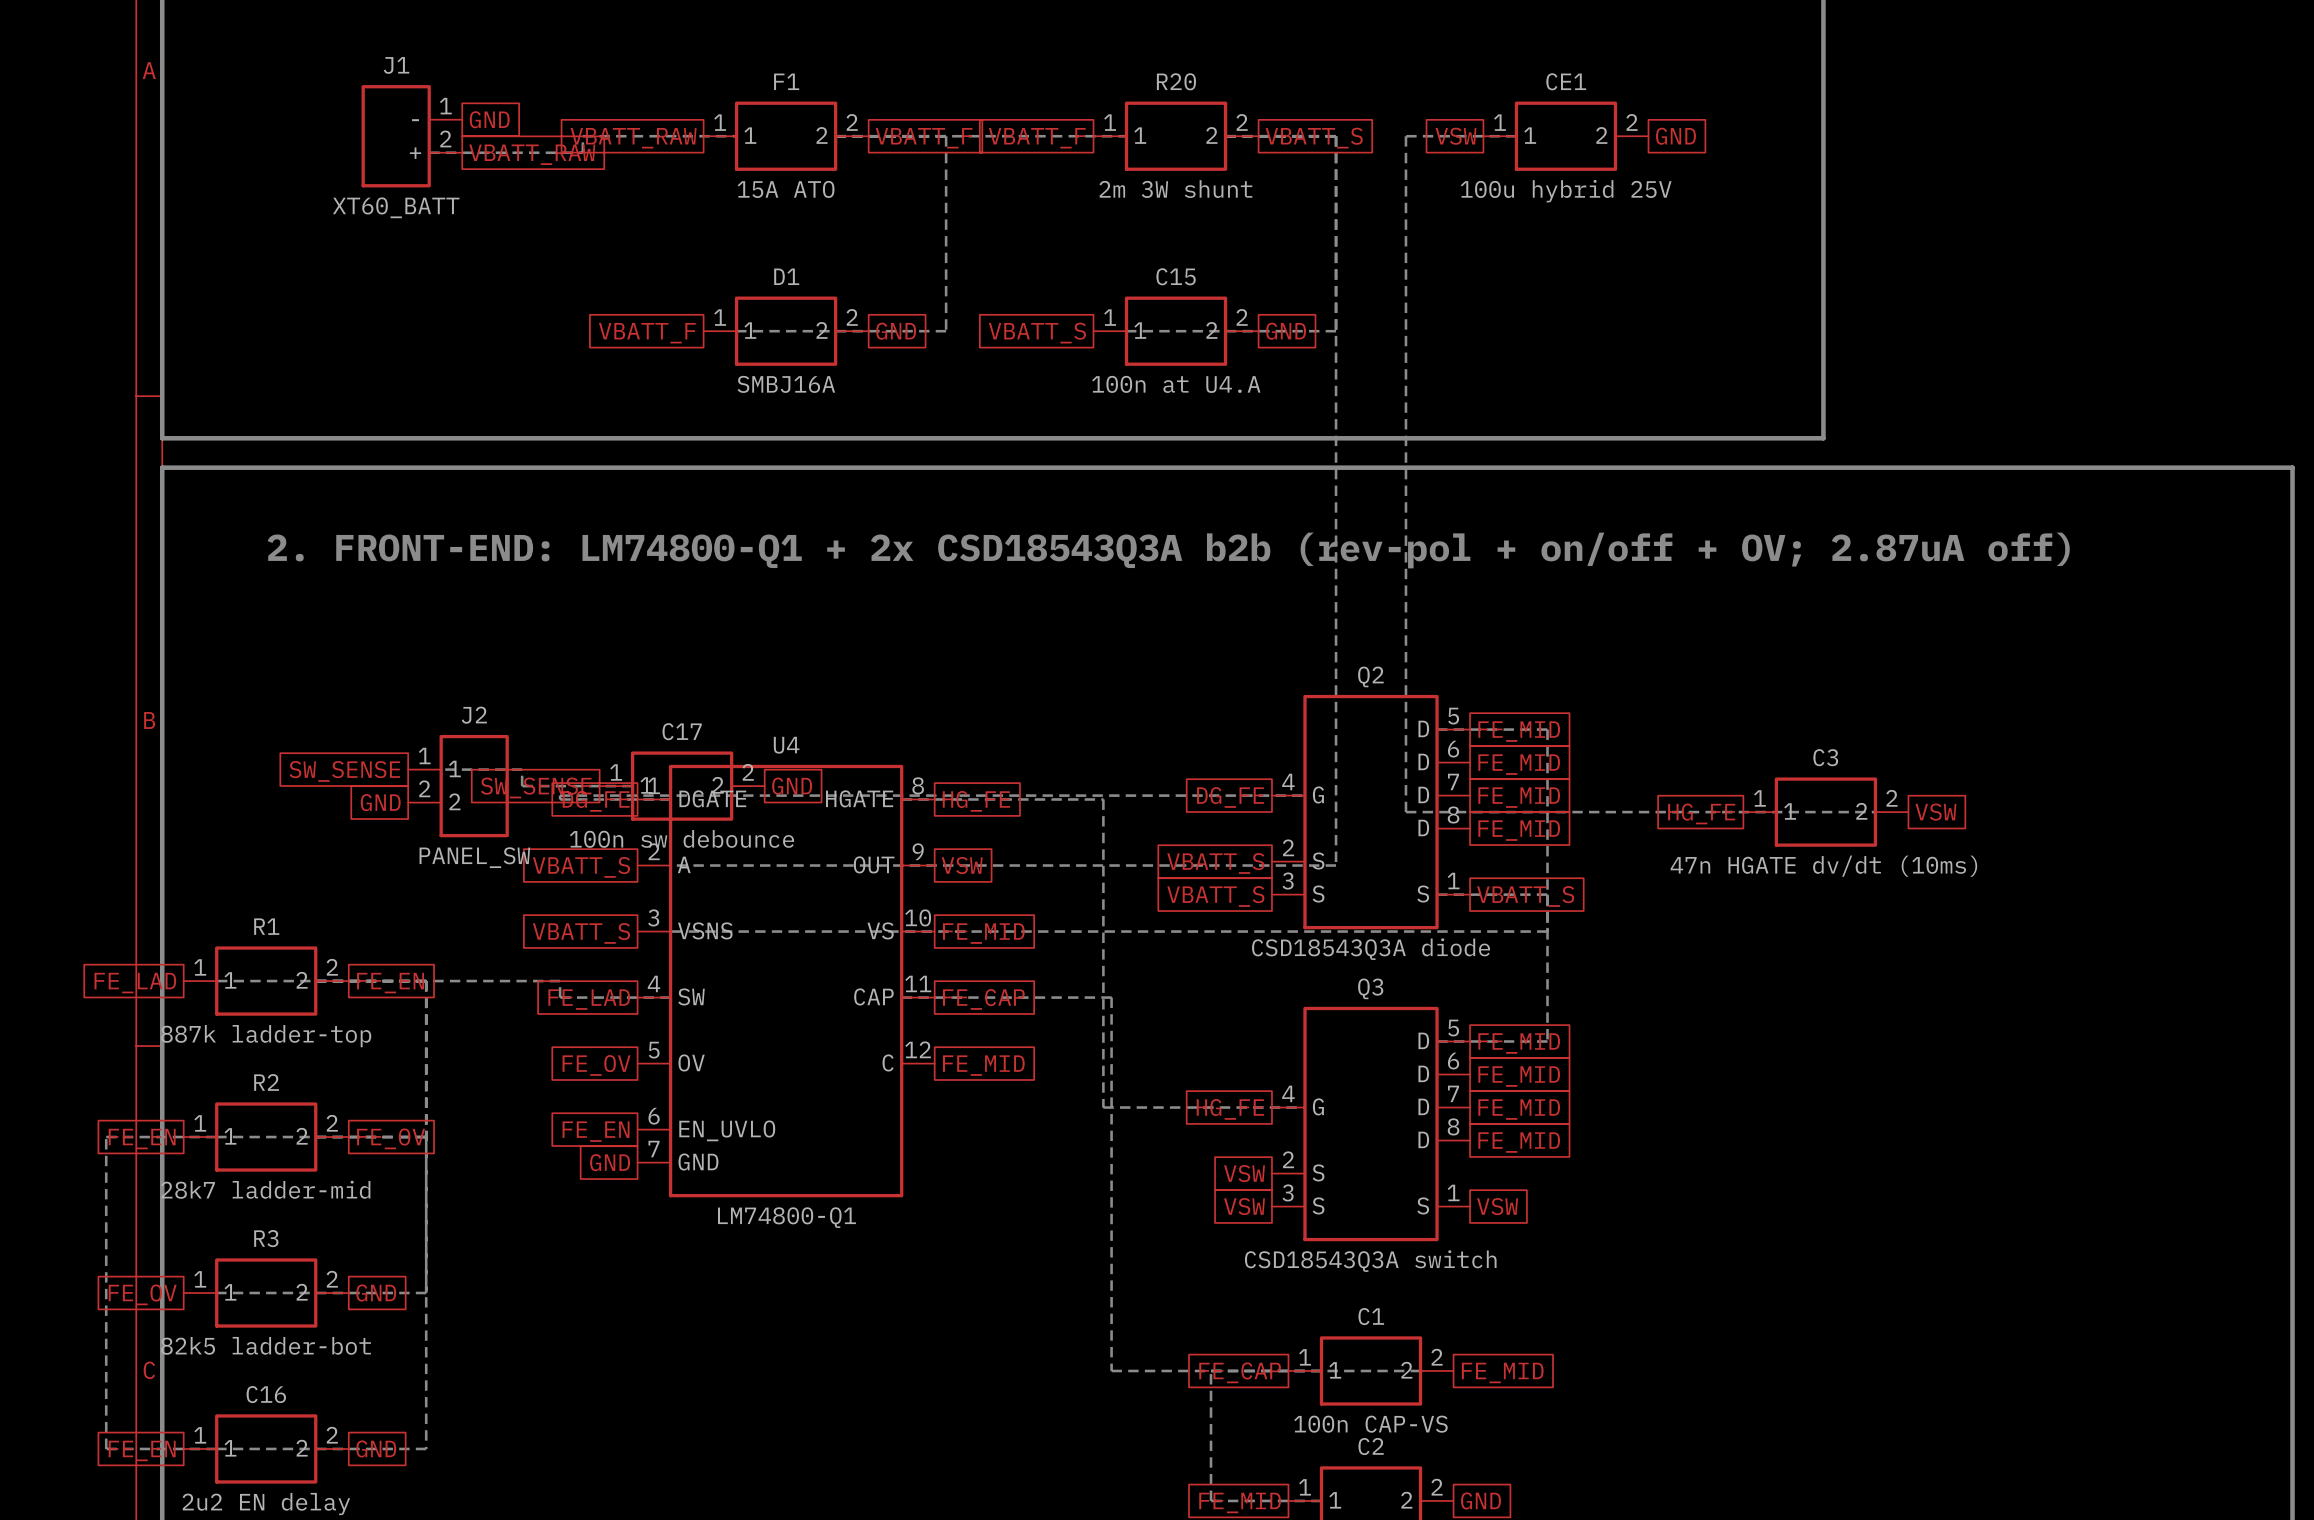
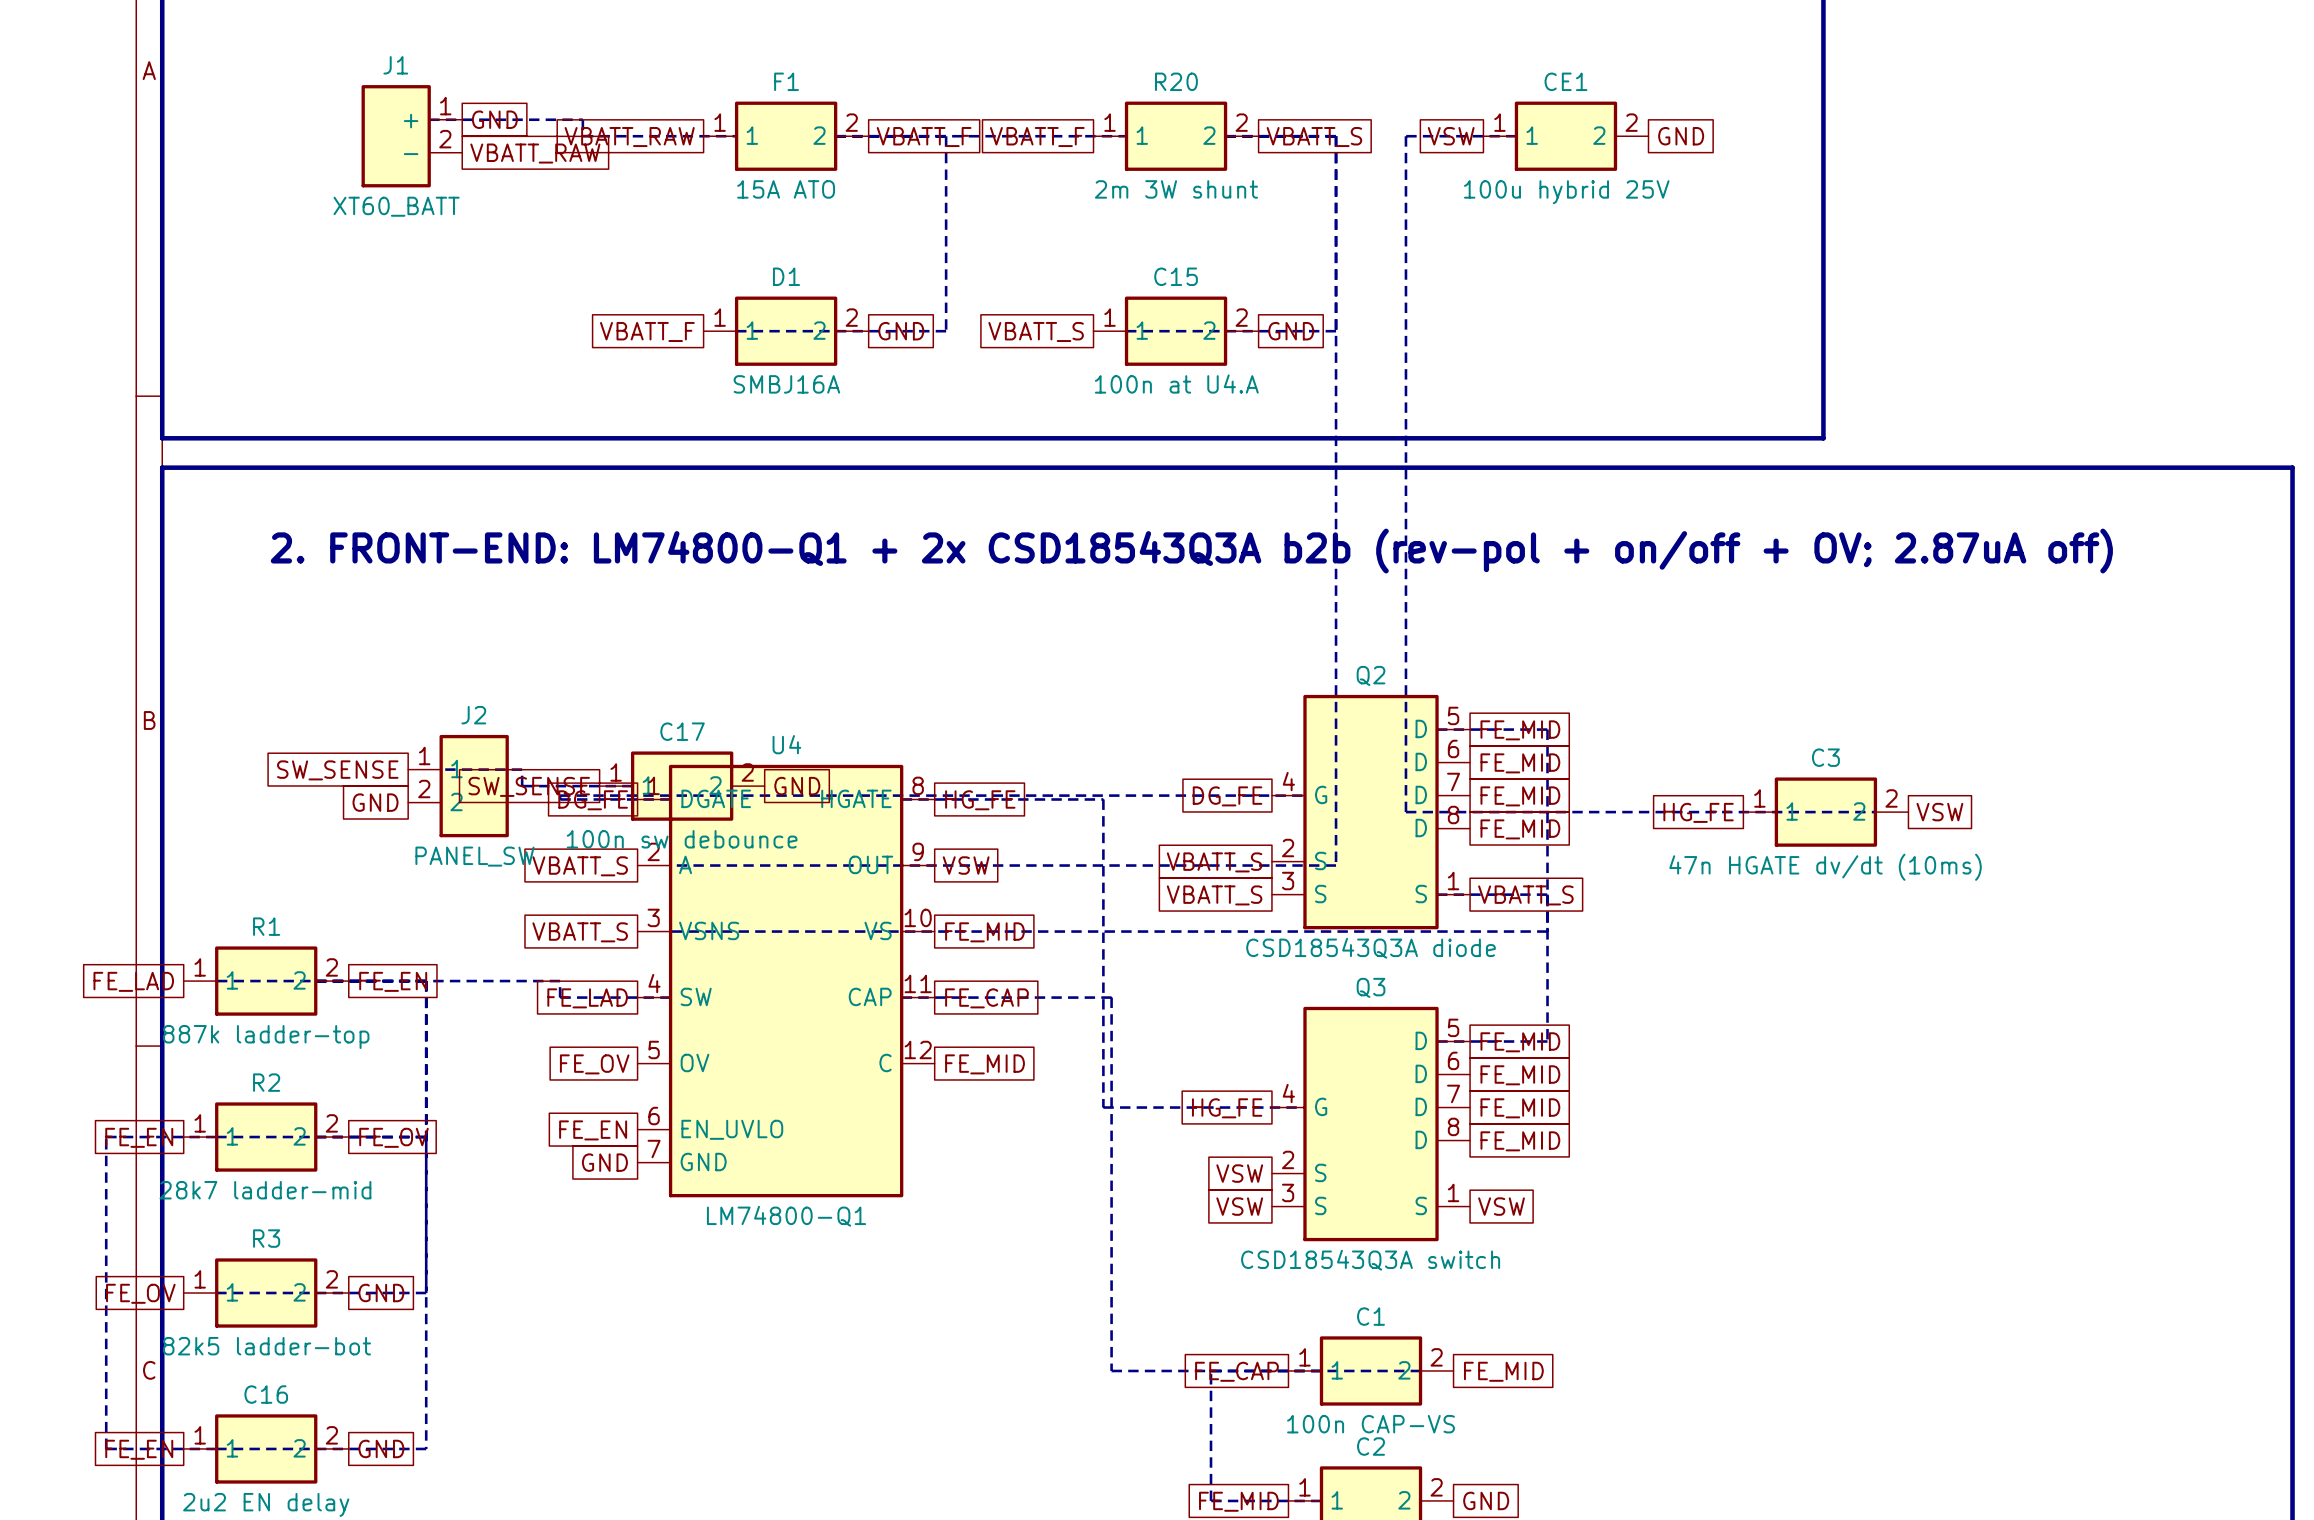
J1 pin name: - (415, 120) -> + (411, 121)
line: (582, 136) (582, 152) (429, 152) -> (582, 136) (582, 119) (429, 119)
J1 pin name: + (415, 153) -> - (411, 154)

